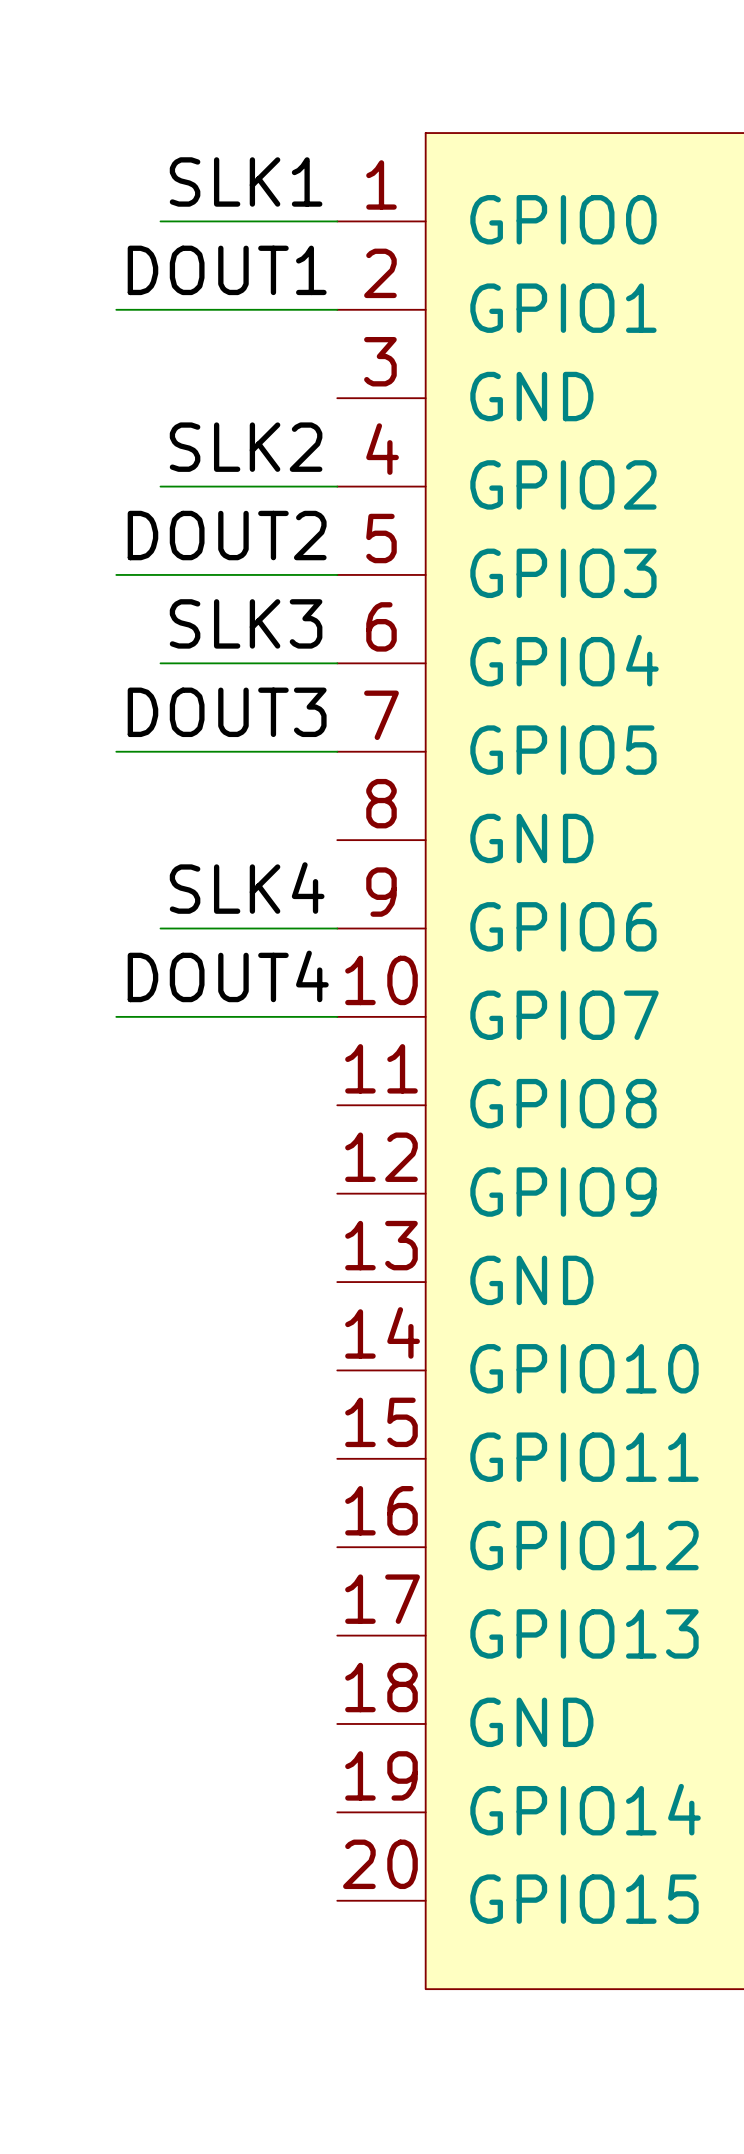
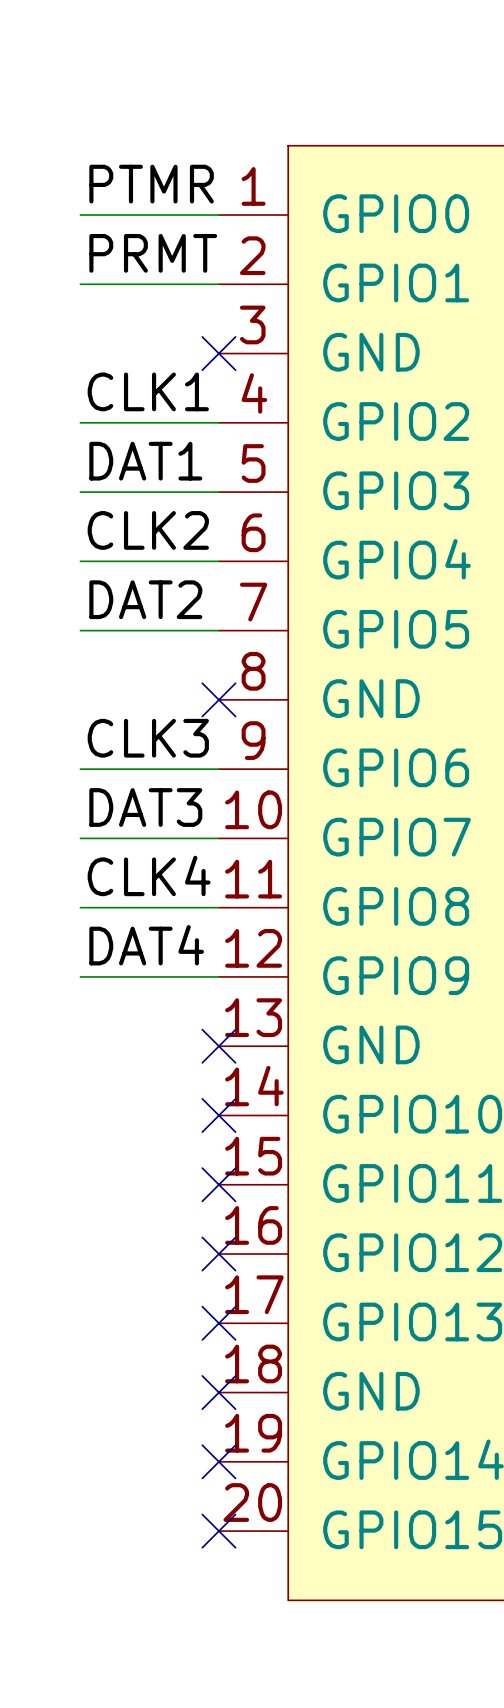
label: SLK1 (246, 181) -> PTMR (151, 184)
label: DOUT1 (227, 270) -> none
label: none -> PRMT (153, 253)
wire: (116, 309) (160, 309) -> none
no-connect mark: none -> (218, 353)
label: SLK2 (246, 447) -> CLK1 (148, 391)
label: DOUT2 (227, 535) -> none
label: none -> DAT1 (145, 461)
wire: (116, 574) (160, 574) -> none
label: SLK3 (246, 623) -> CLK2 (148, 530)
label: DOUT3 (227, 712) -> none
label: none -> DAT2 (145, 599)
wire: (116, 751) (160, 751) -> none
no-connect mark: none -> (218, 699)
label: SLK4 (247, 888) -> CLK3 (148, 738)
label: DOUT4 (228, 976) -> none
label: none -> DAT3 (145, 807)
wire: (116, 1016) (160, 1016) -> none
label: none -> CLK4 (149, 875)
wire: none -> (80, 907) (218, 907)
label: none -> DAT4 (146, 945)
wire: none -> (80, 976) (218, 976)
no-connect mark: none -> (218, 1046)
no-connect mark: none -> (218, 1115)
no-connect mark: none -> (218, 1184)
no-connect mark: none -> (218, 1254)
no-connect mark: none -> (218, 1323)
no-connect mark: none -> (218, 1392)
no-connect mark: none -> (218, 1461)
no-connect mark: none -> (218, 1531)

